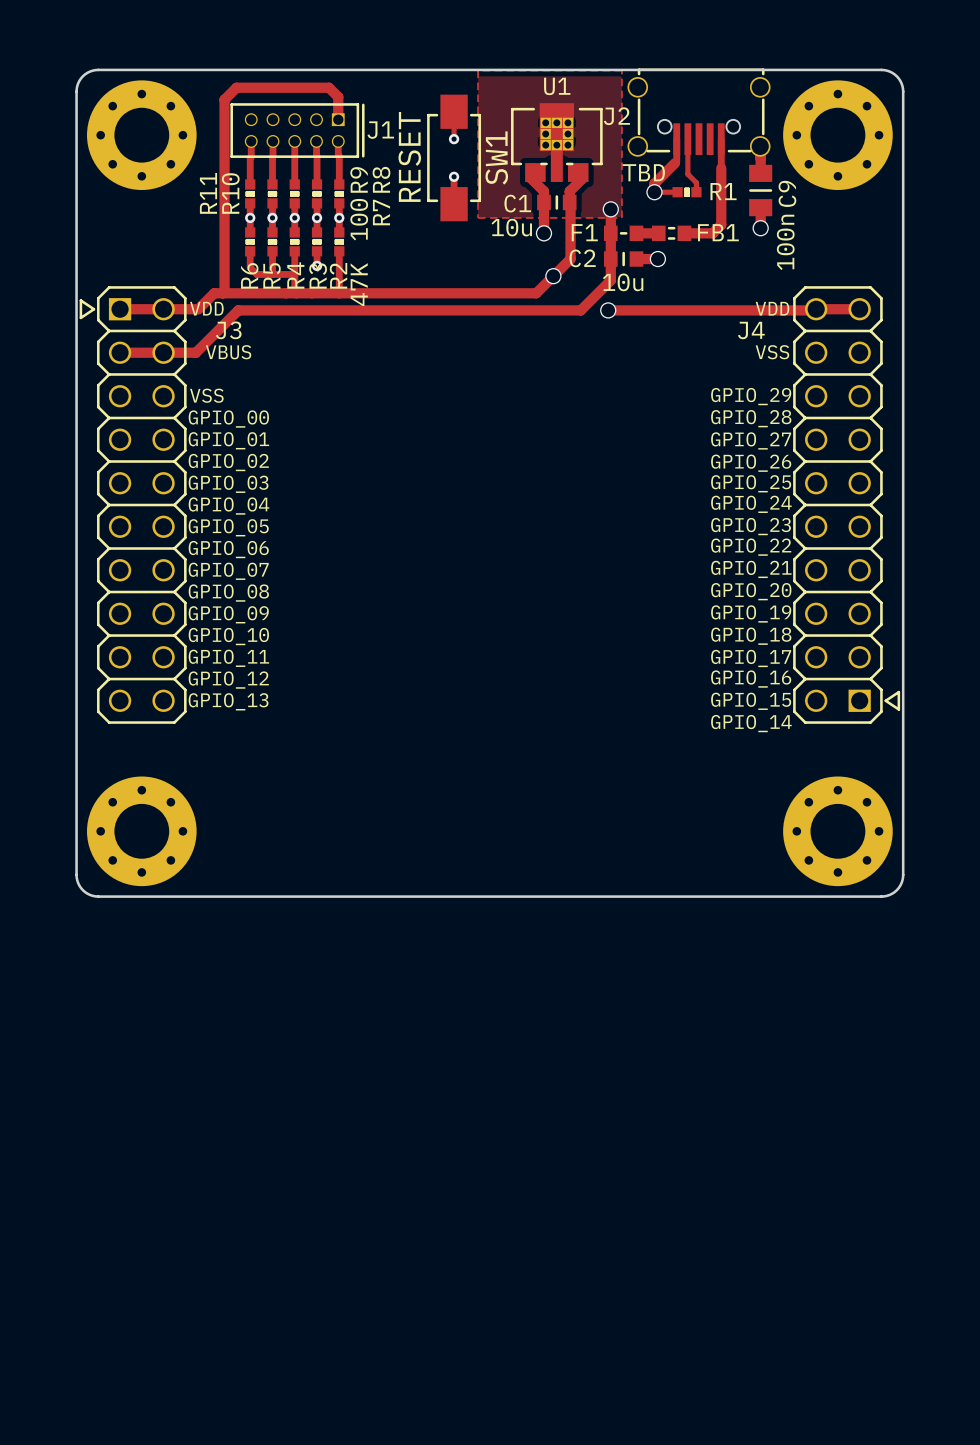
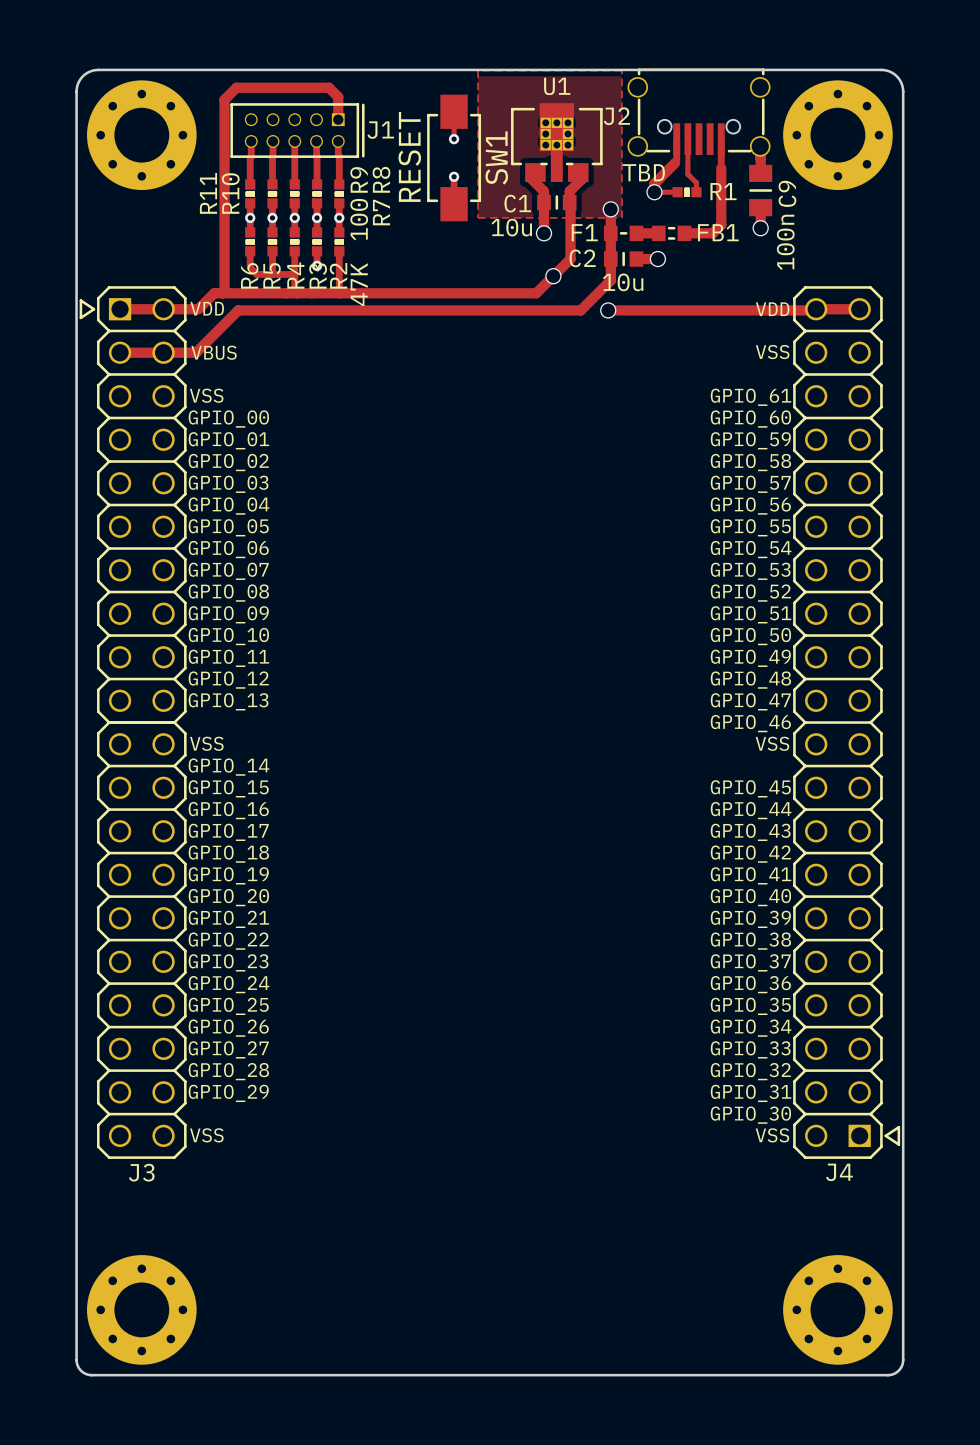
J3 footprint: [79, 286, 187, 724] -> [79, 286, 187, 1159]
J4 footprint: [793, 286, 901, 724] -> [793, 286, 901, 1159]
J3 name position: J3 (228, 330) -> J3 (141, 1172)
J4 name position: J4 (751, 330) -> J4 (839, 1172)
part: (141, 831) -> none
part: (837, 831) -> none
board edge: (76, 874) (78, 883) (82, 890) (89, 894) (98, 896) (881, 896) (889, 894) (896, 890) (901, 883) (903, 874) -> (76, 874) (76, 1359) (78, 1367) (84, 1373) (91, 1375) (887, 1375) (898, 1370) (903, 1359) (903, 874)
part: none -> (141, 1309)
part: none -> (837, 1309)

